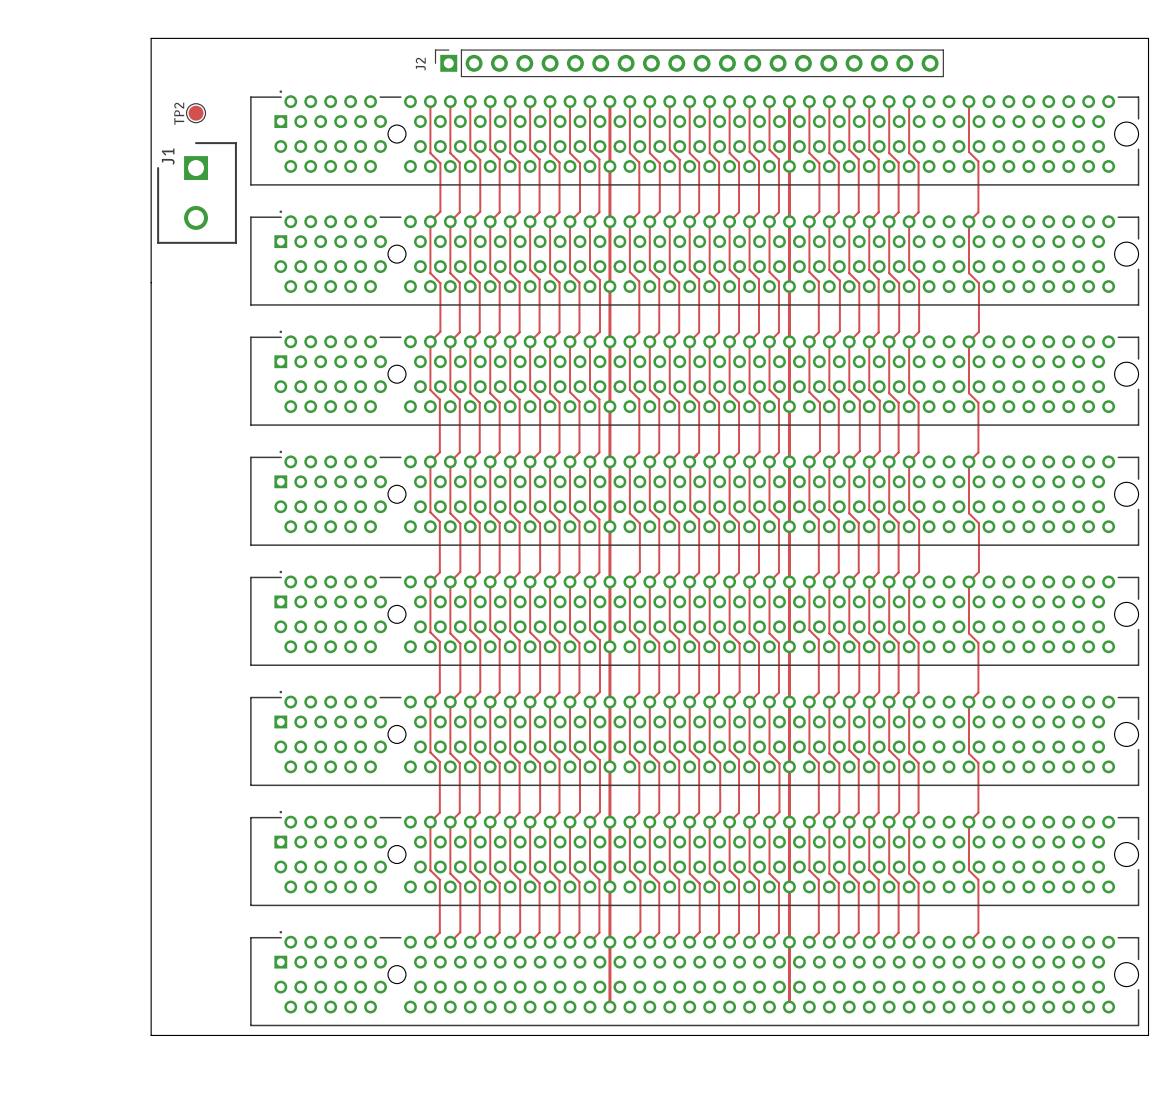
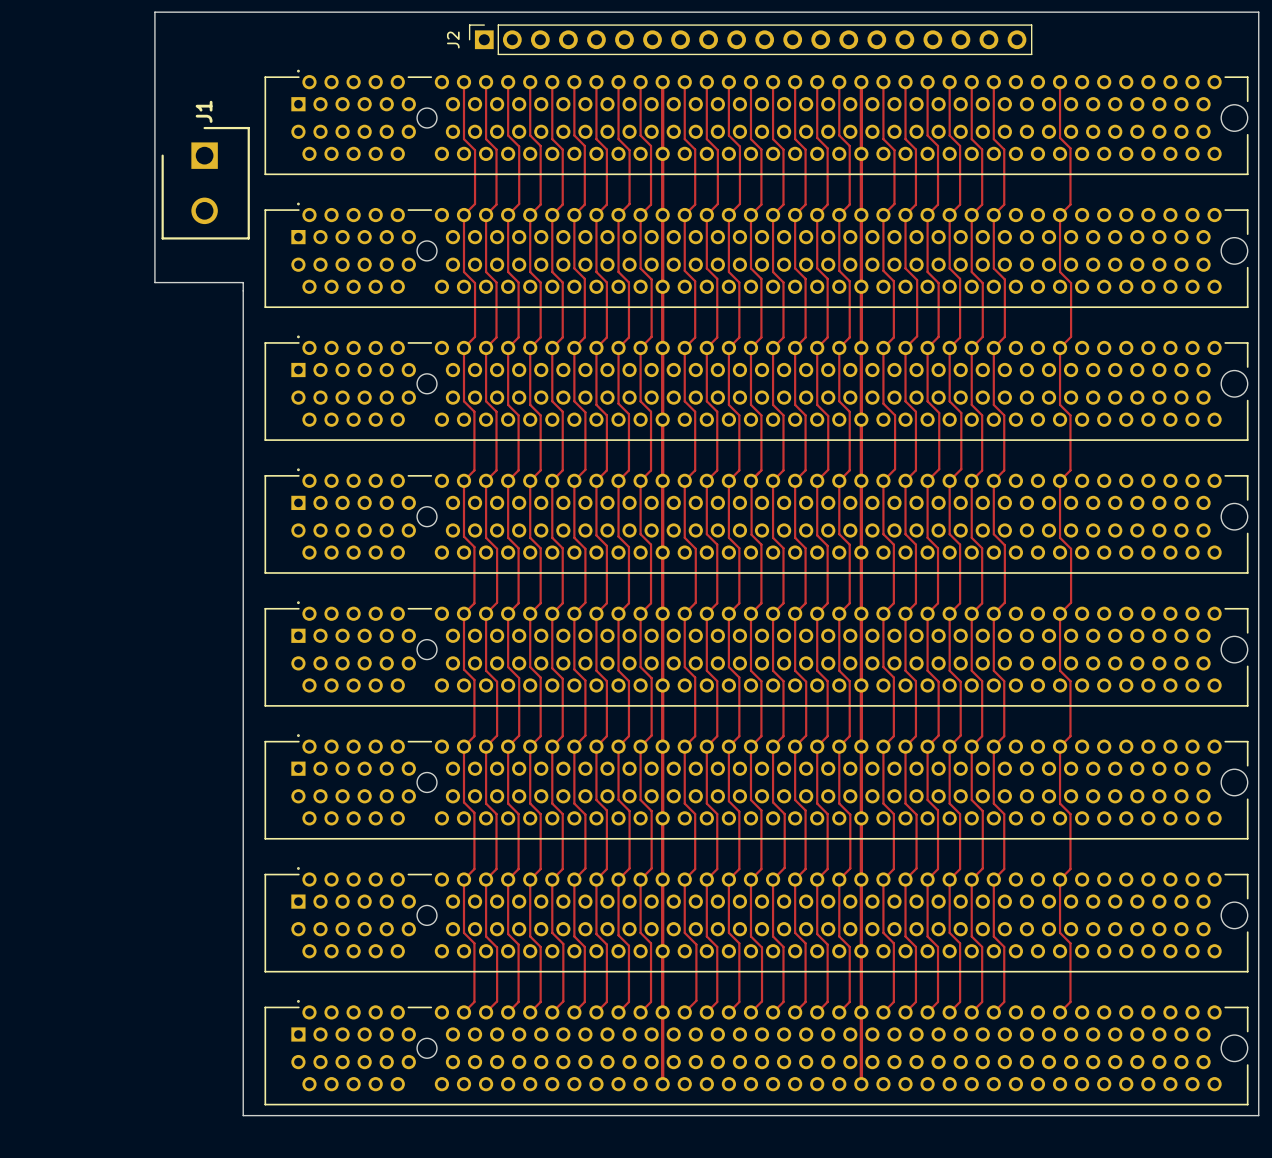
TP2: (196, 113) -> none
J1 name position: J1 (168, 156) -> J1 (204, 111)
board edge: (151, 282) (151, 1035) (230, 1035) -> (154, 282) (243, 282) (243, 1115)

